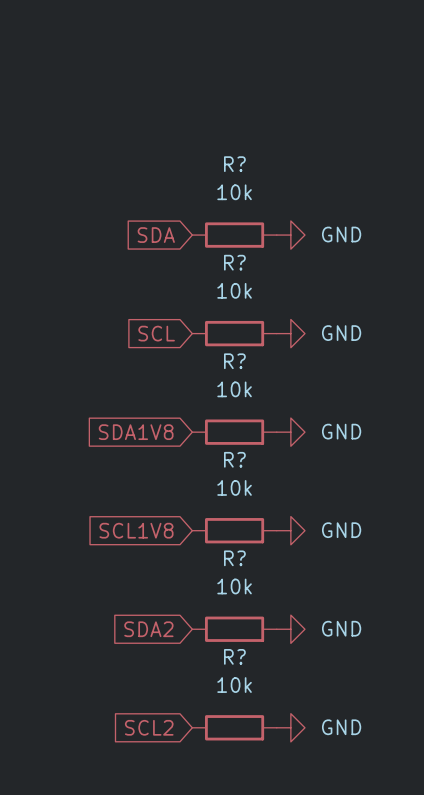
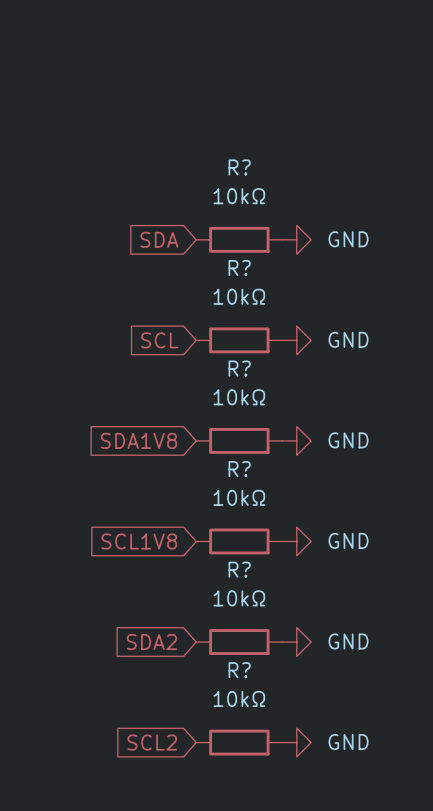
R? value: 10k (234, 192) -> 10kΩ (239, 196)
R? value: 10k (234, 290) -> 10kΩ (239, 296)
R? value: 10k (234, 389) -> 10kΩ (239, 397)
R? value: 10k (234, 487) -> 10kΩ (239, 497)
R? value: 10k (234, 586) -> 10kΩ (239, 598)
R? value: 10k (234, 685) -> 10kΩ (239, 698)

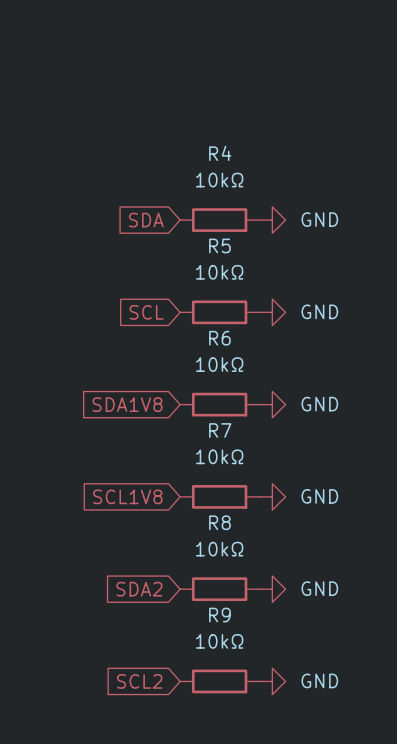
R? name: R? (239, 167) -> R4 (220, 153)
R? name: R? (239, 268) -> R5 (219, 245)
R? name: R? (239, 368) -> R6 (219, 338)
R? name: R? (239, 469) -> R7 (220, 430)
R? name: R? (239, 569) -> R8 (219, 522)
R? name: R? (239, 670) -> R9 (219, 615)

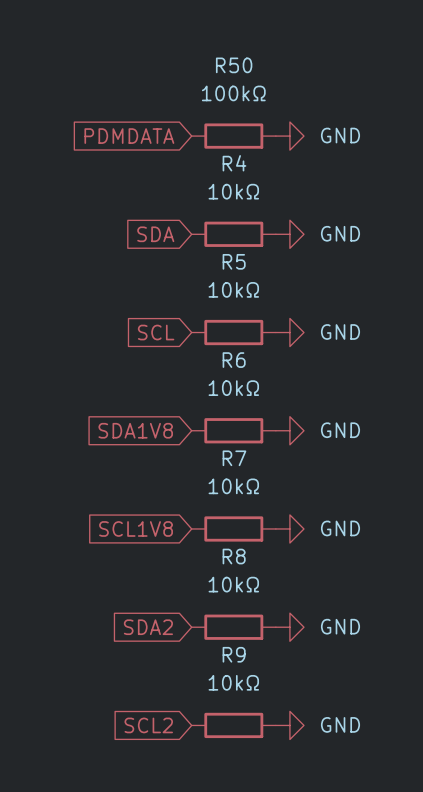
global label: none -> PDMDATA (129, 136)
R50: none -> 100kΩ (233, 136)
power symbol: none -> GND (289, 136)

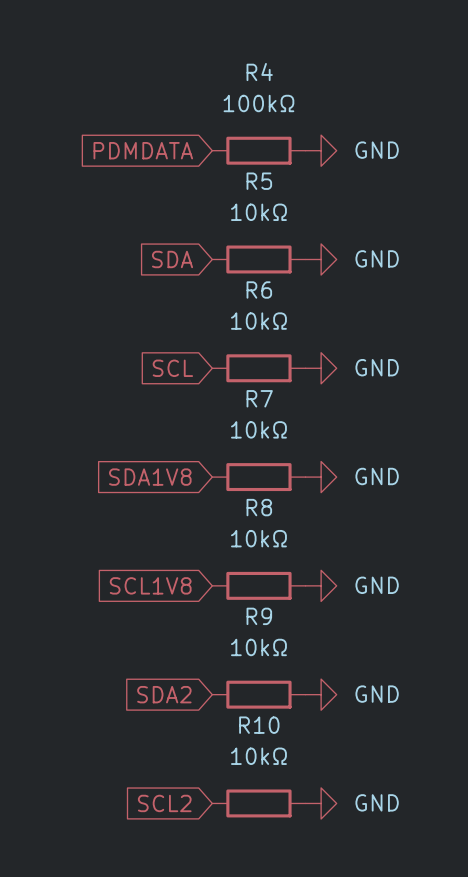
R50 name: R50 (234, 65) -> R4 (259, 72)
R4 name: R4 (234, 163) -> R5 (259, 181)
R5 name: R5 (234, 261) -> R6 (259, 289)
R6 name: R6 (234, 360) -> R7 (259, 398)
R7 name: R7 (234, 458) -> R8 (259, 507)
R8 name: R8 (234, 556) -> R9 (259, 616)
R9 name: R9 (234, 654) -> R10 (259, 725)

